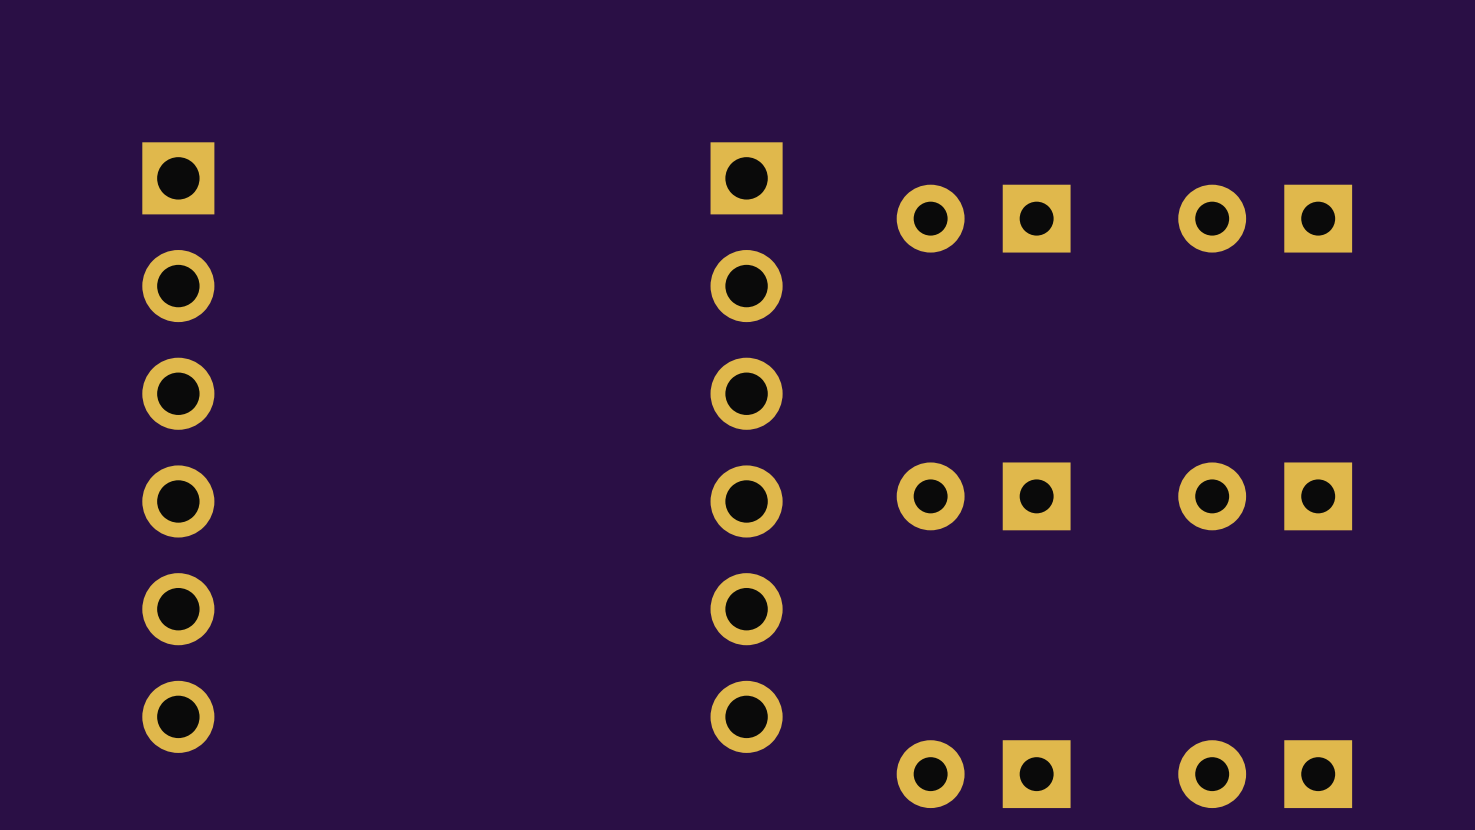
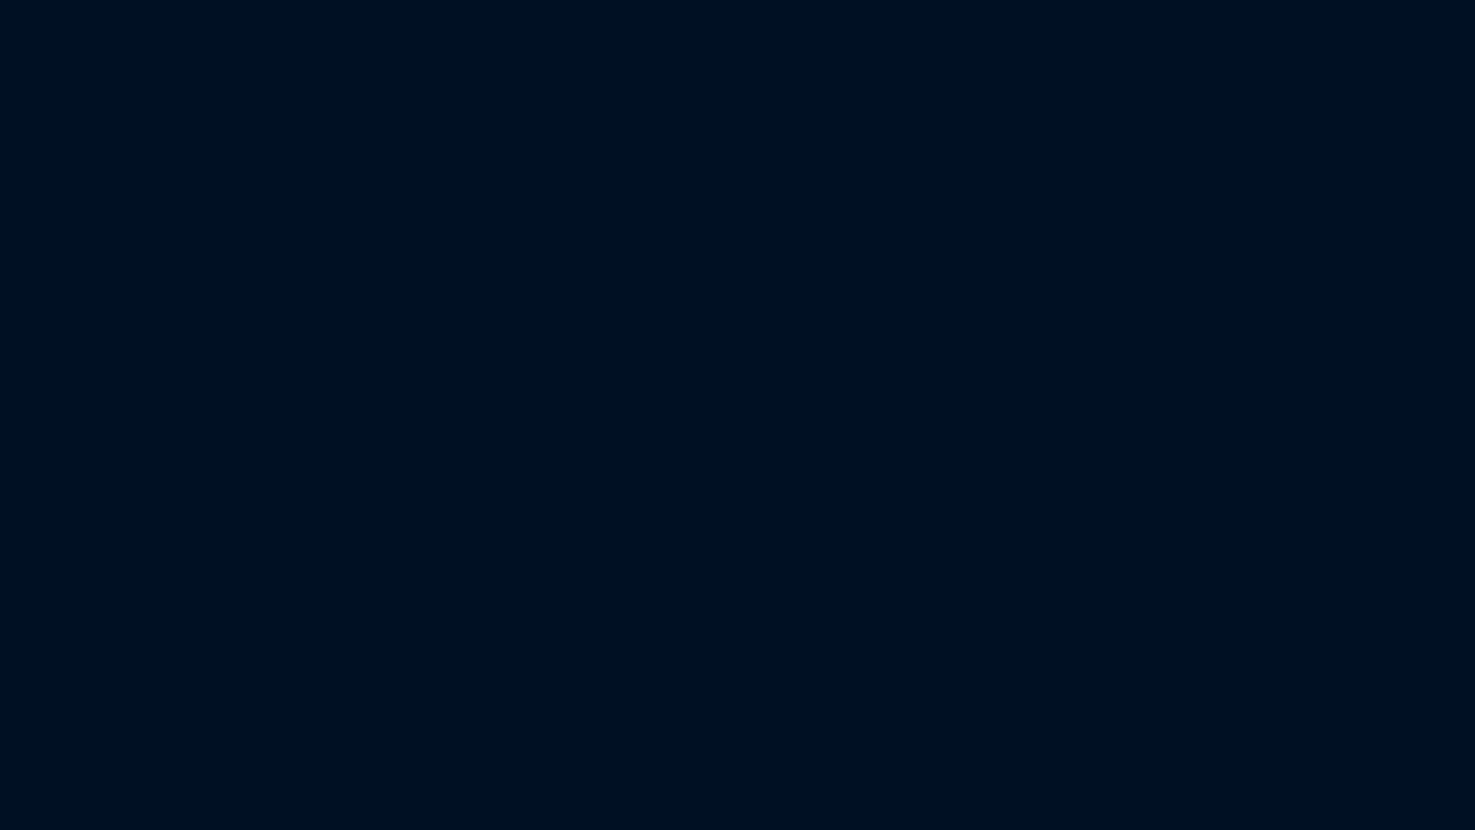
part: (983, 218) -> none
part: (1265, 218) -> none
part: (178, 447) -> none
part: (746, 447) -> none
part: (983, 496) -> none
part: (1265, 496) -> none
part: (983, 774) -> none
part: (1265, 774) -> none

